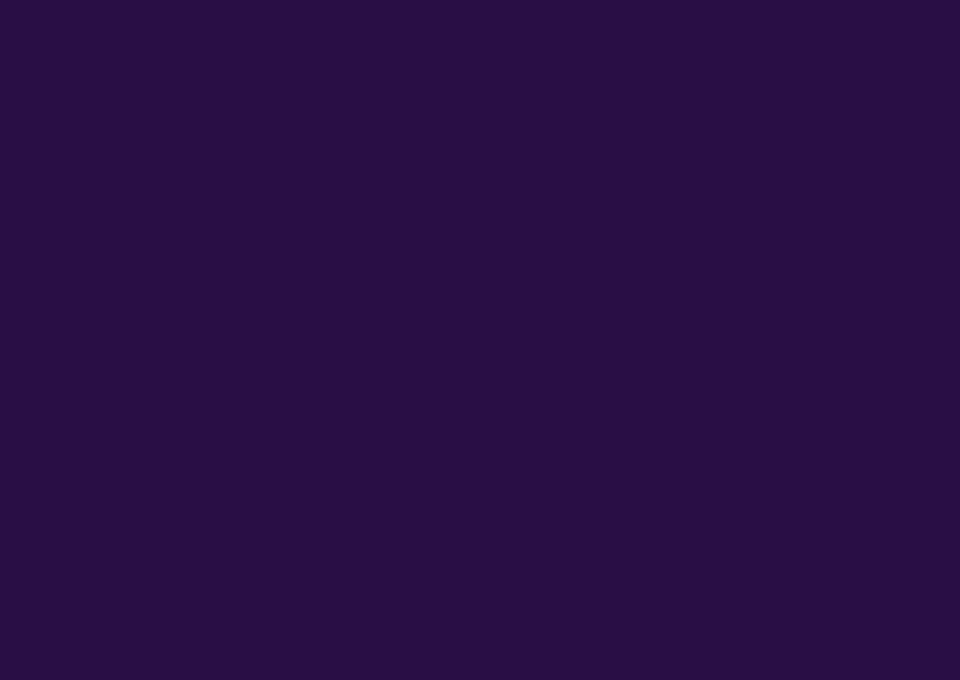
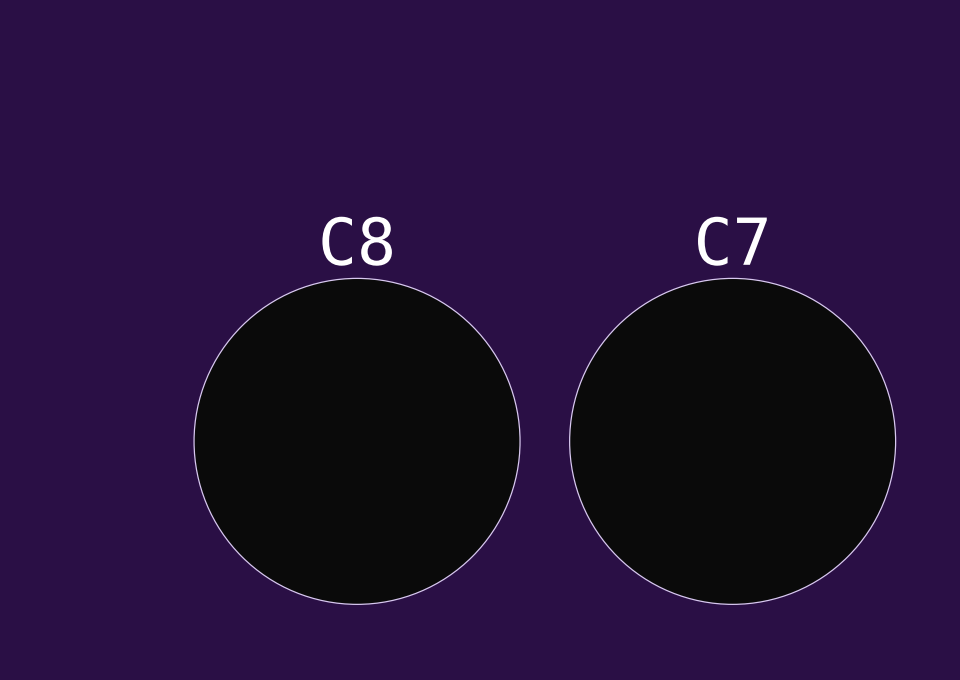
C8: none -> (357, 441)
C7: none -> (732, 441)

